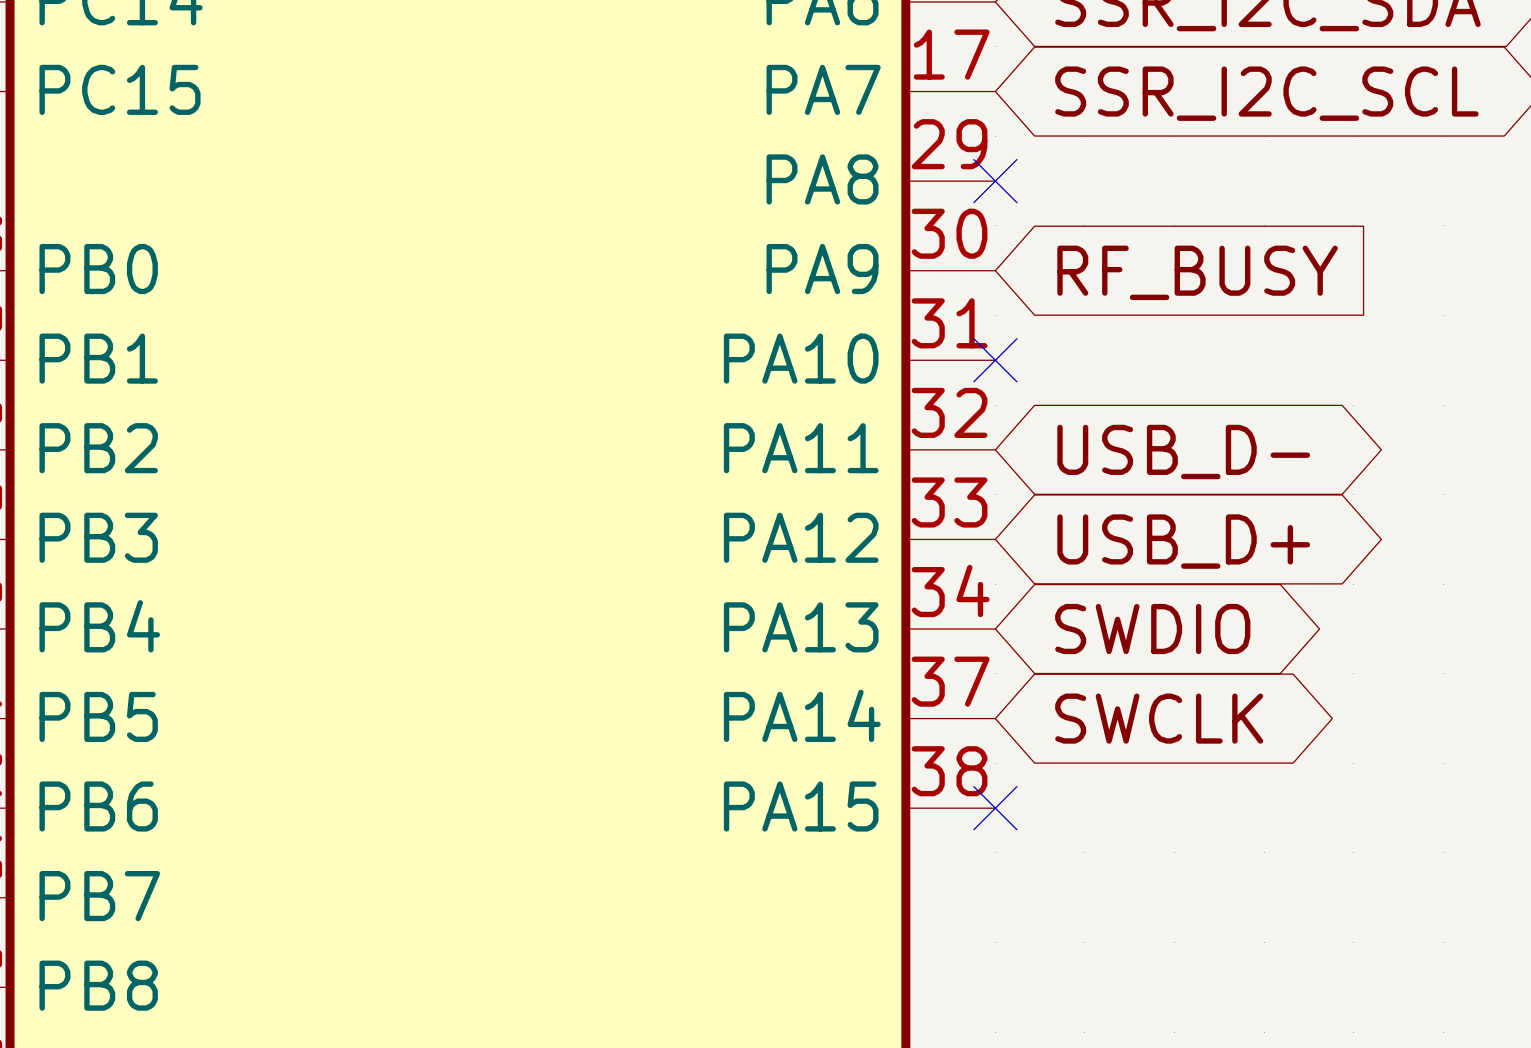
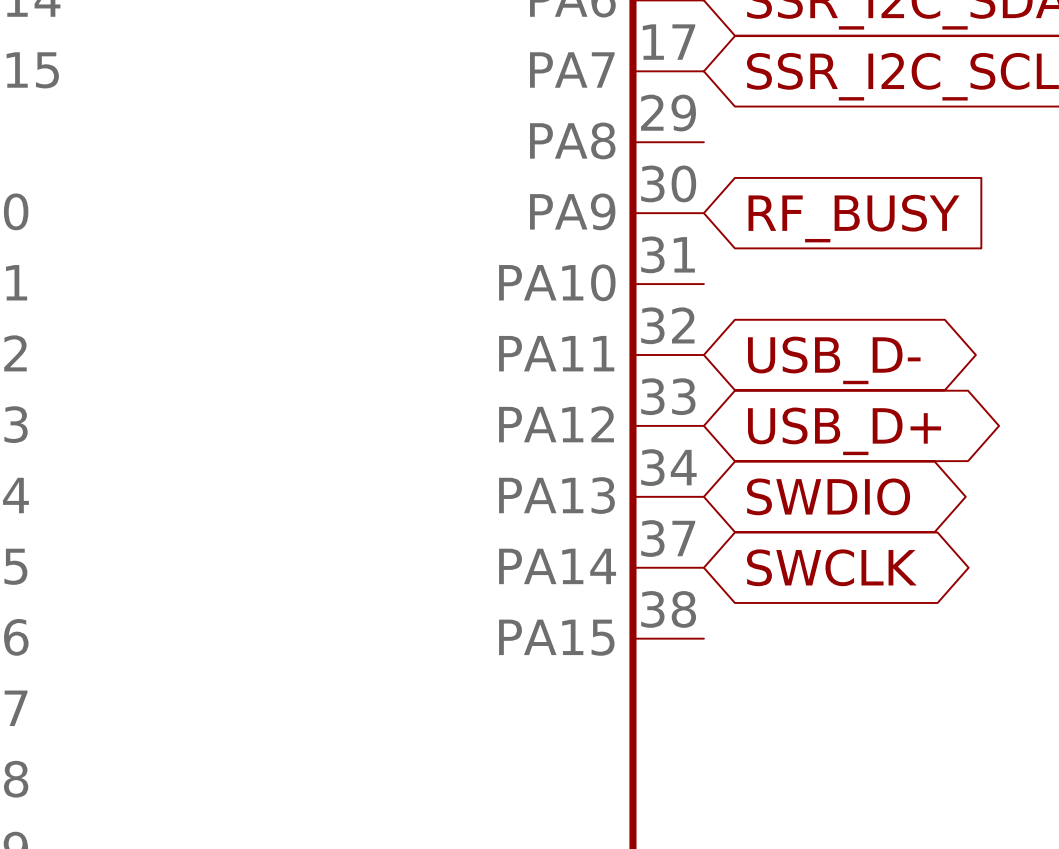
no-connect mark: (995, 181) -> none
no-connect mark: (995, 360) -> none
no-connect mark: (995, 808) -> none

